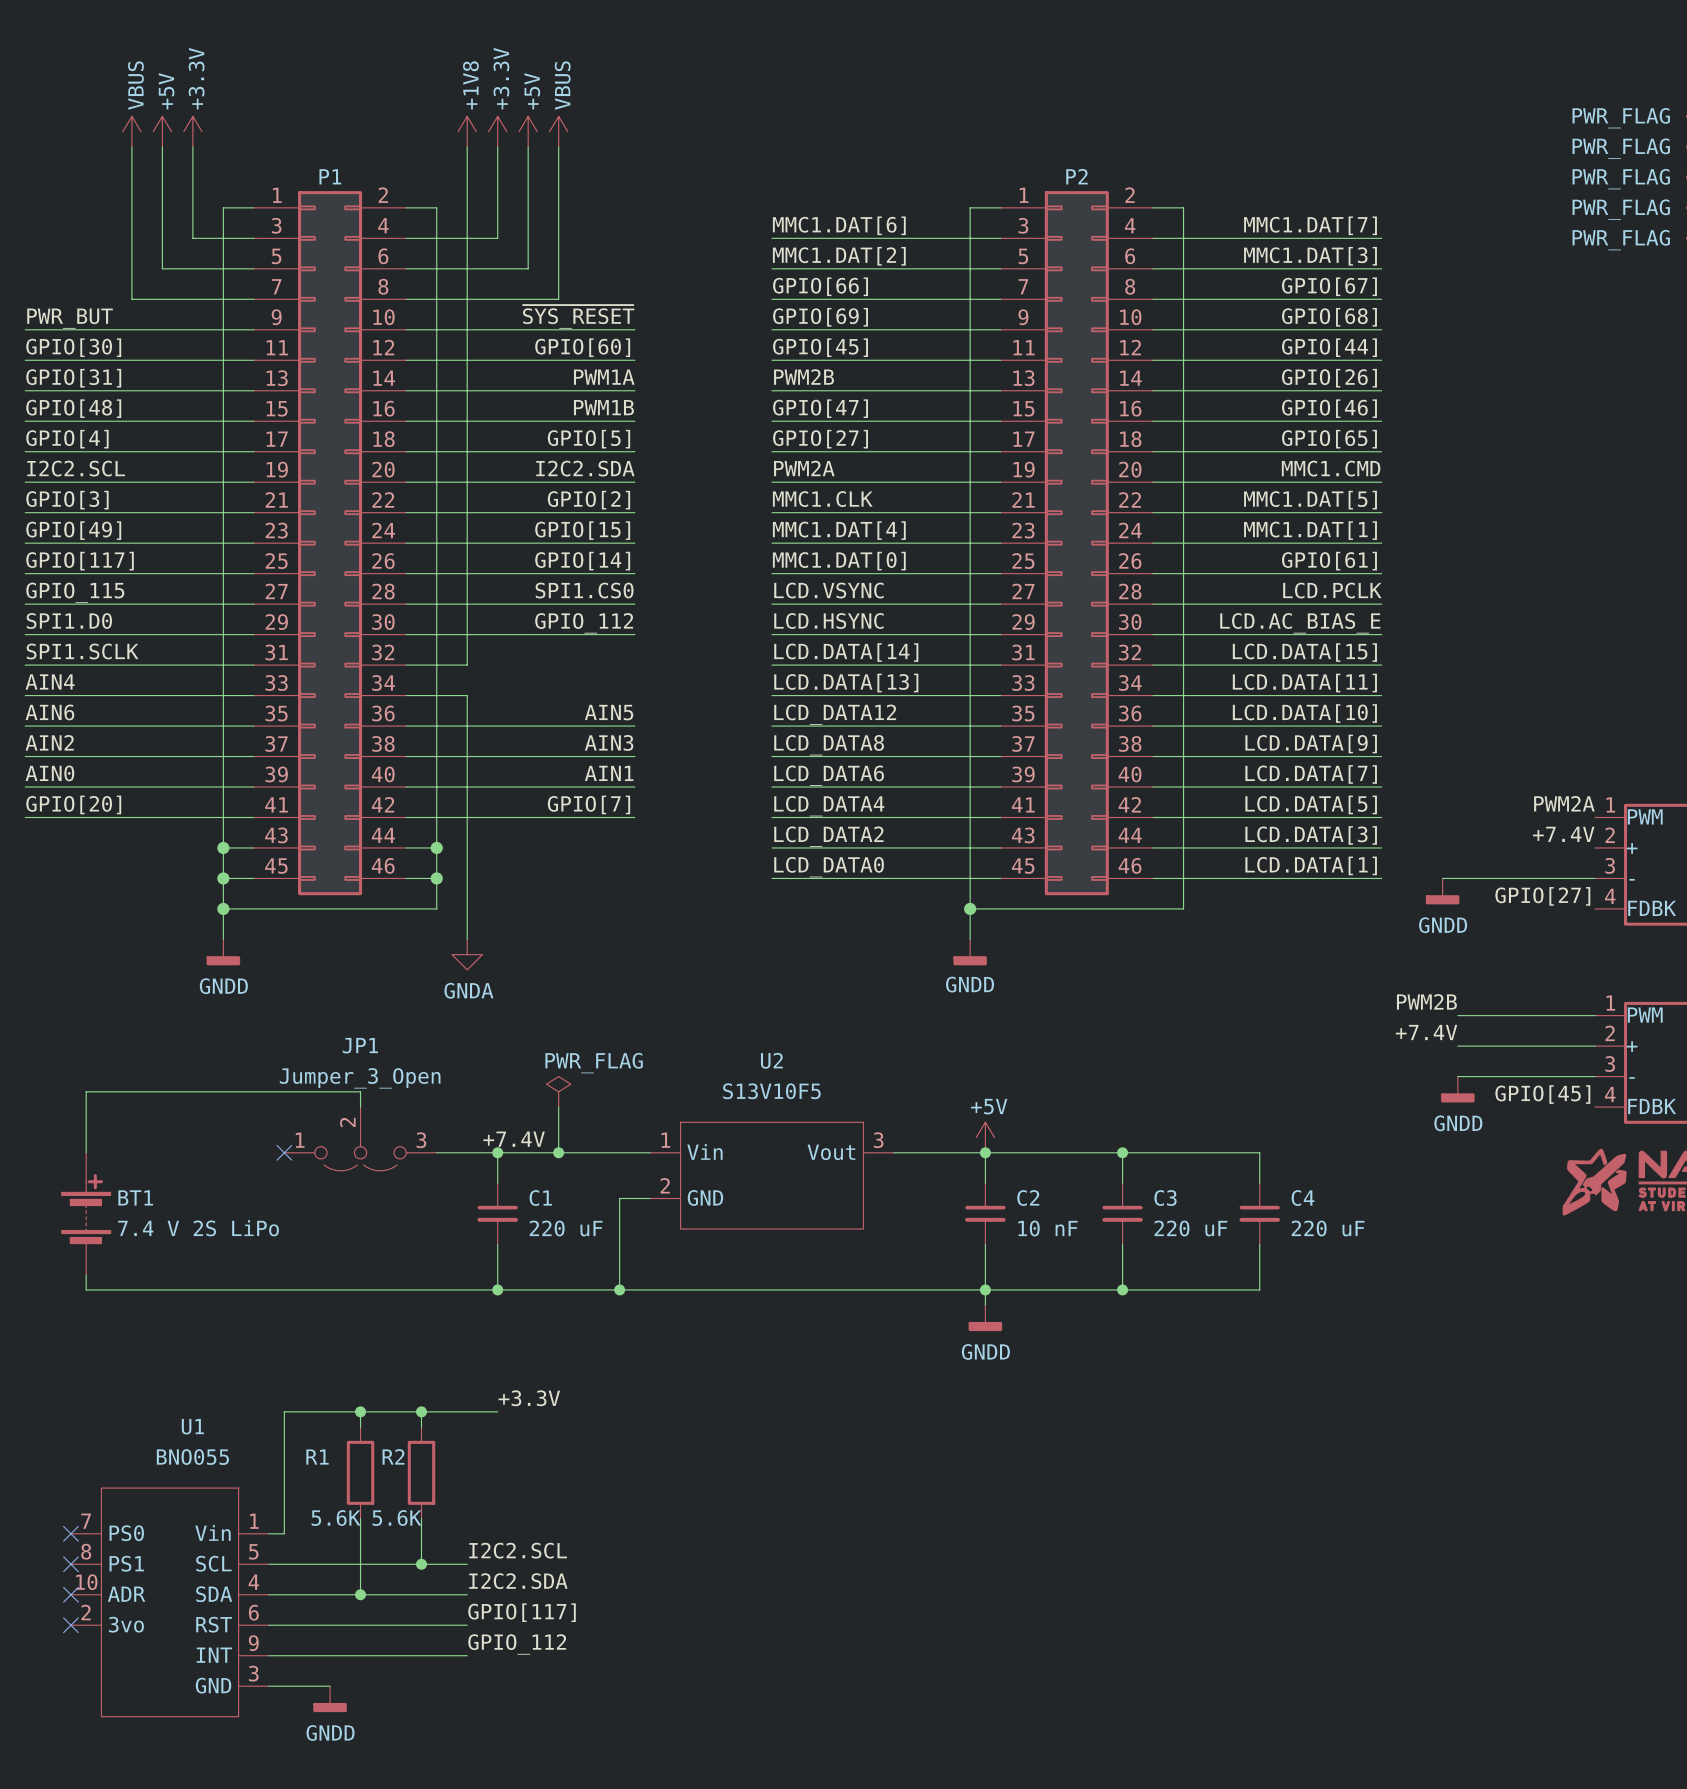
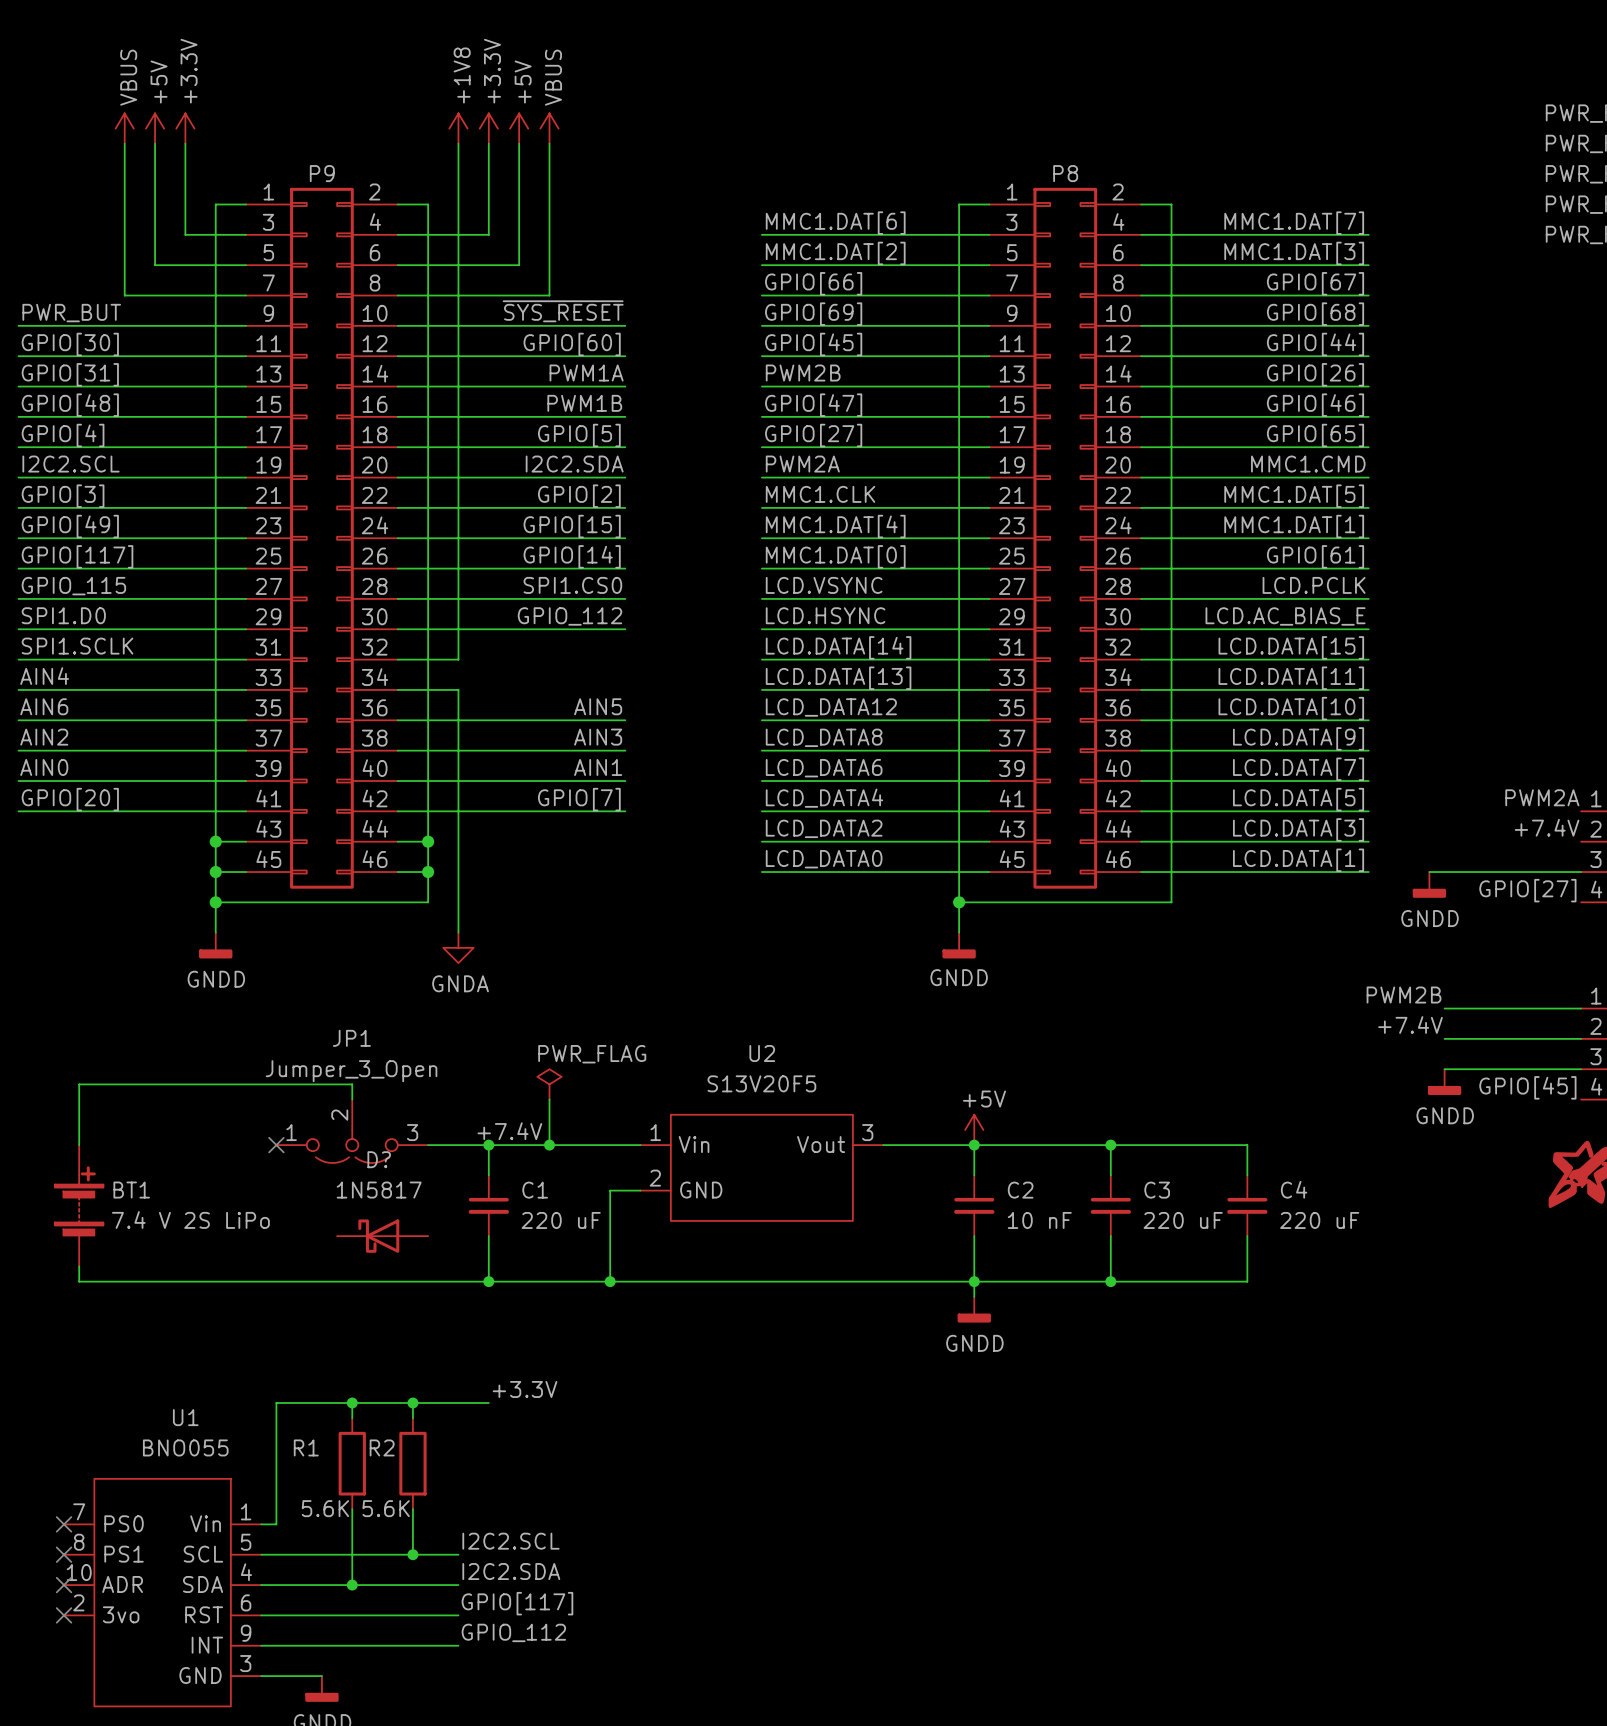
P1 name: P1 (330, 176) -> P9 (322, 173)
P2 name: P2 (1076, 176) -> P8 (1065, 173)
U2 value: S13V10F5 (771, 1091) -> S13V20F5 (761, 1083)
D?: none -> 1N5817 (382, 1236)

